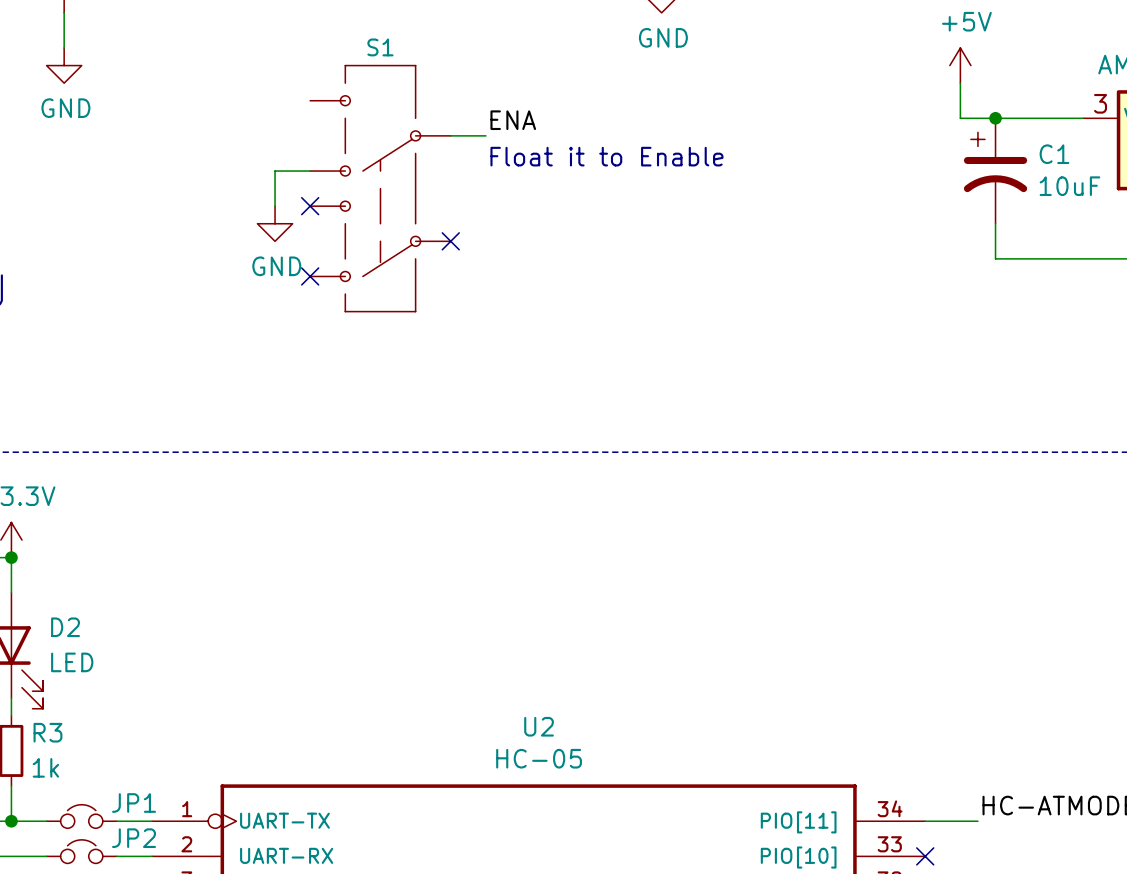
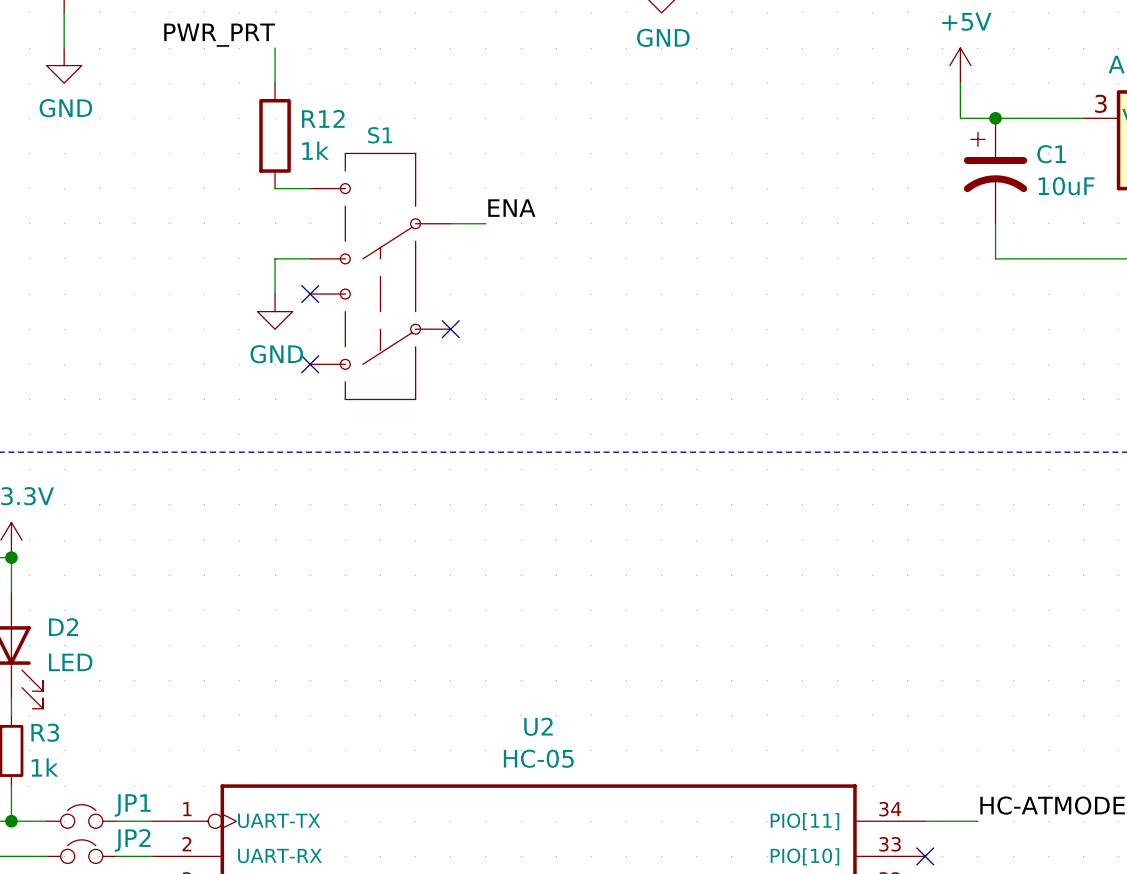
label: none -> PWR_PRT (219, 35)
wire: none -> (275, 48) (275, 83)
label position: ENA (513, 120) -> ENA (511, 208)
R12: none -> 1k (275, 135)
wire: (450, 135) (485, 135) -> (450, 223) (485, 223)
text: Float it to Enable (606, 156) -> none
wire: (310, 171) (275, 171) (275, 206) -> (310, 258) (275, 258) (275, 294)
wire: none -> (275, 188) (310, 188)
S1 position: (380, 188) -> (380, 276)
no-connect mark: (310, 206) -> none
power symbol position: GND (275, 223) -> GND (275, 311)
no-connect mark: (450, 241) -> none
no-connect mark position: (310, 276) -> (310, 294)
no-connect mark: none -> (450, 329)
no-connect mark: none -> (310, 364)

